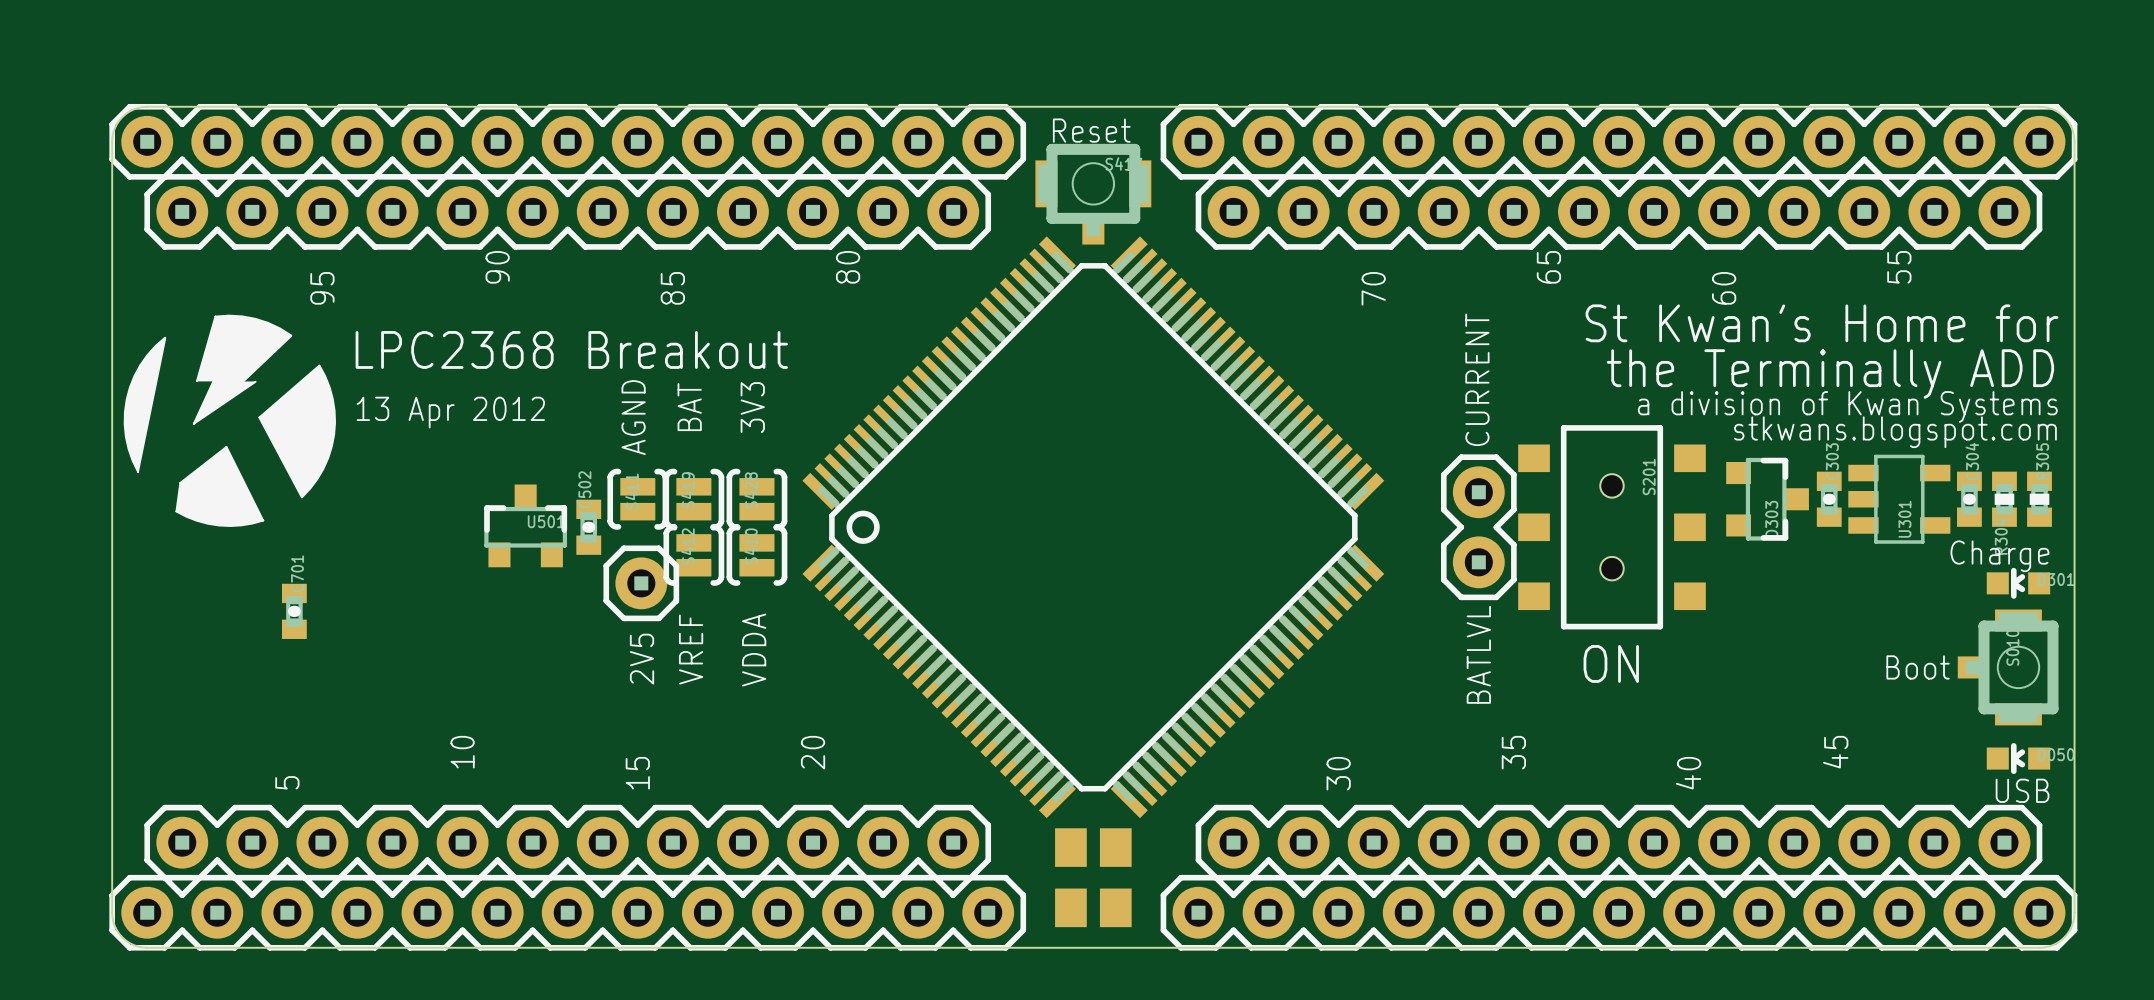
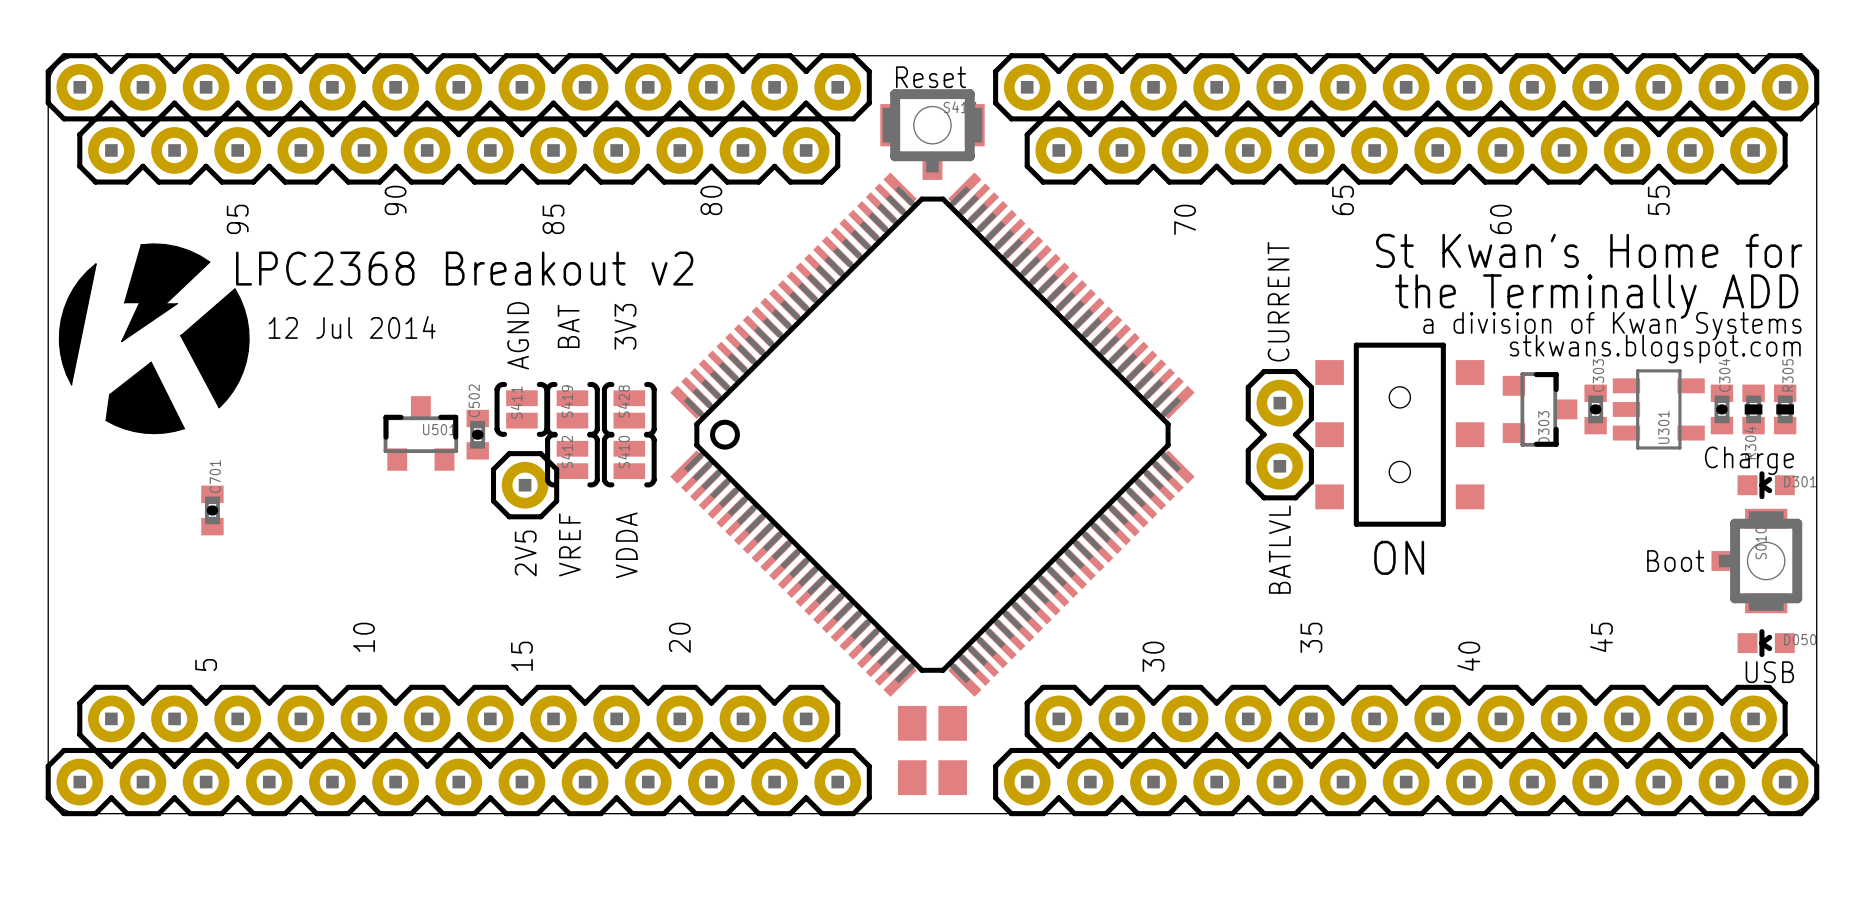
text: LPC2368 Breakout (571, 349) -> LPC2368 Breakout v2 (464, 268)
text: 13 Apr 2012 (450, 412) -> 12 Jul 2014 (352, 327)
S201 name: S201 (1649, 477) -> none

